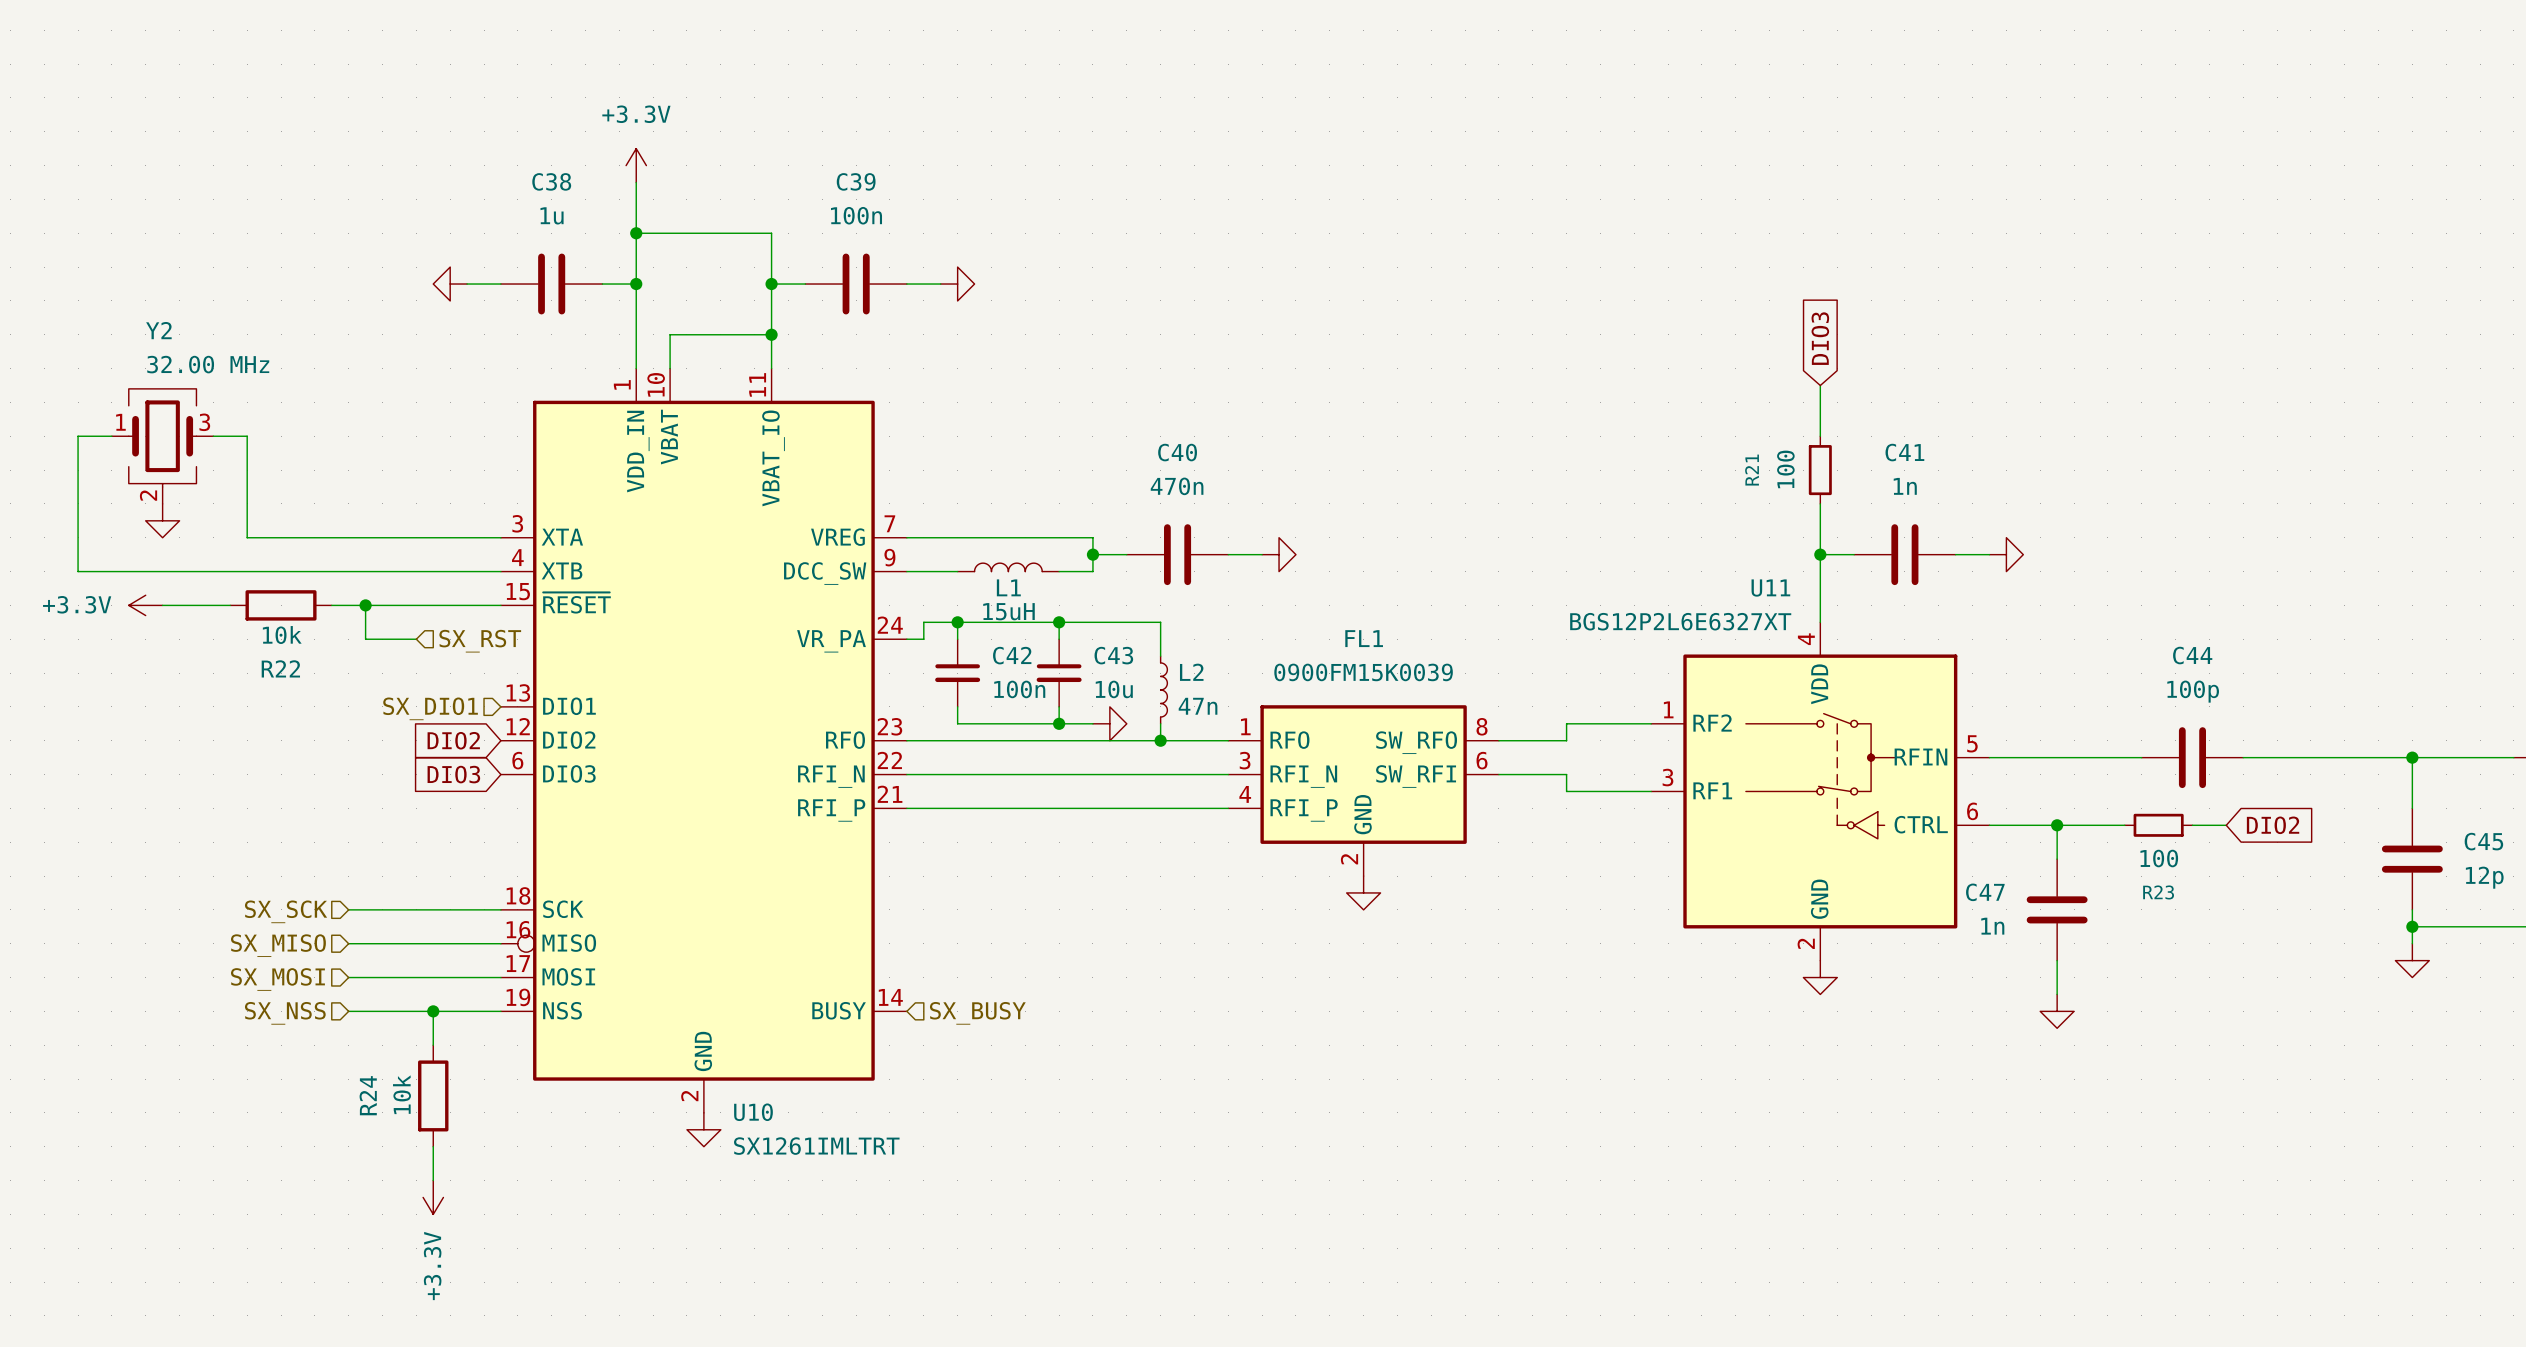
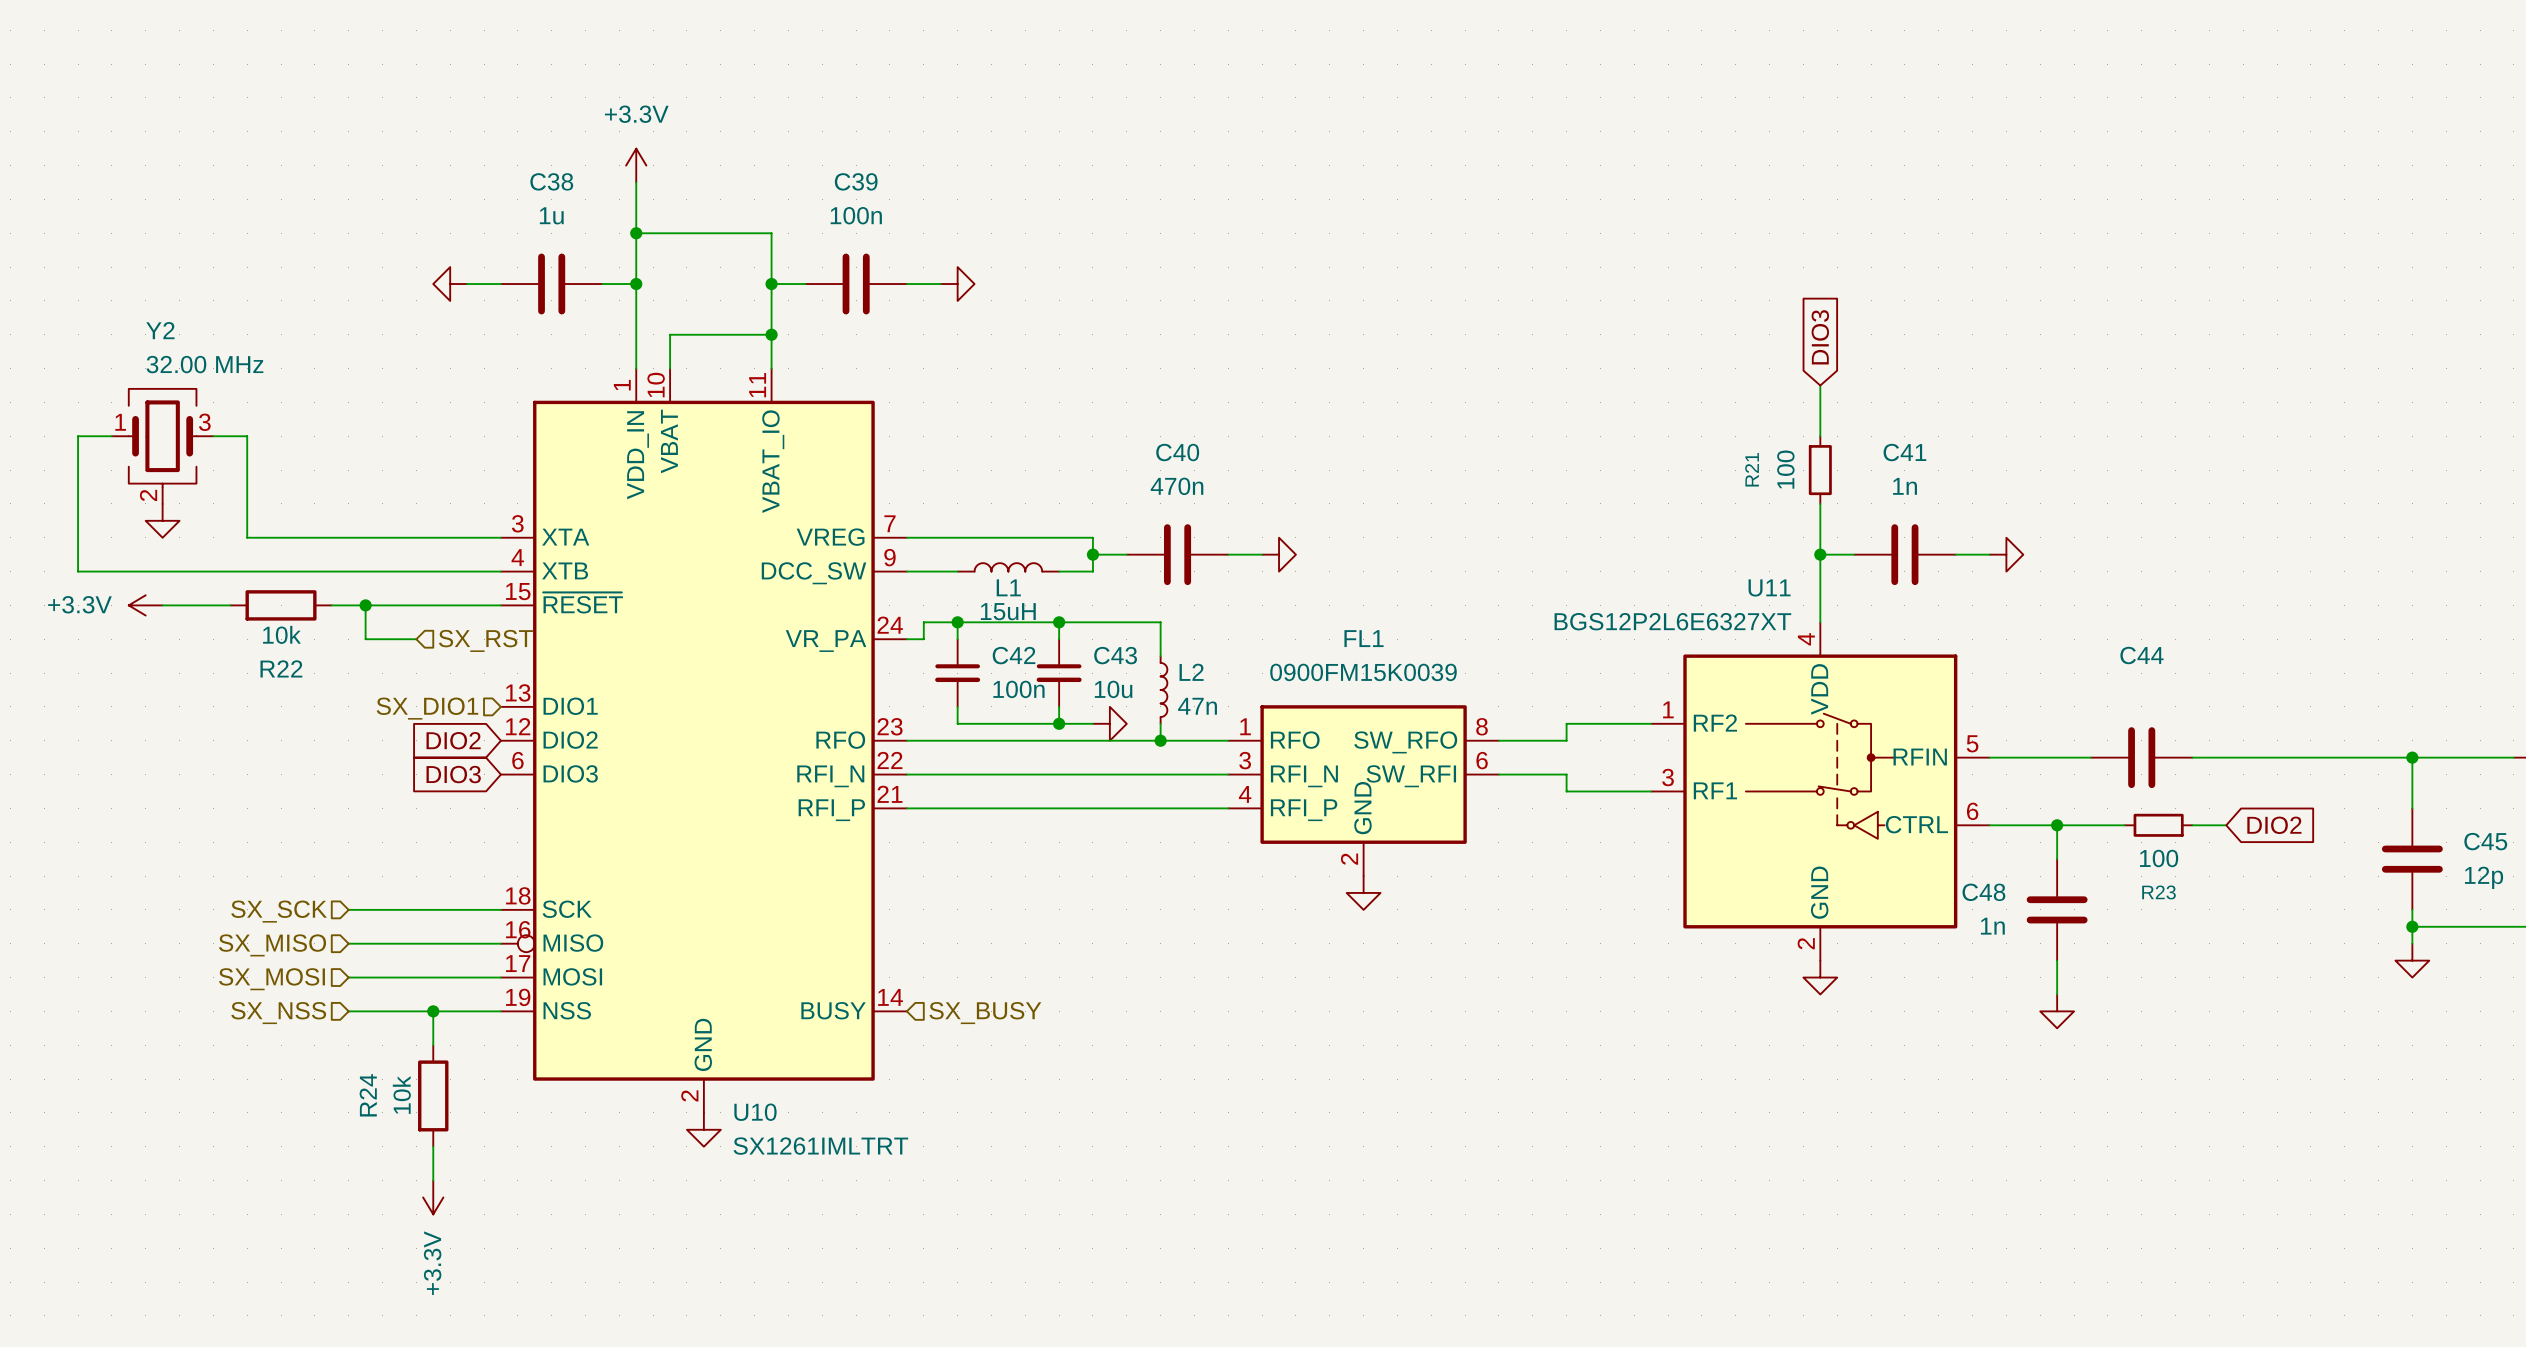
C44 value: 100p (2193, 691) -> none
C44 position: (2192, 757) -> (2141, 757)
C47 name: C47 (1985, 892) -> C48 (1983, 892)

